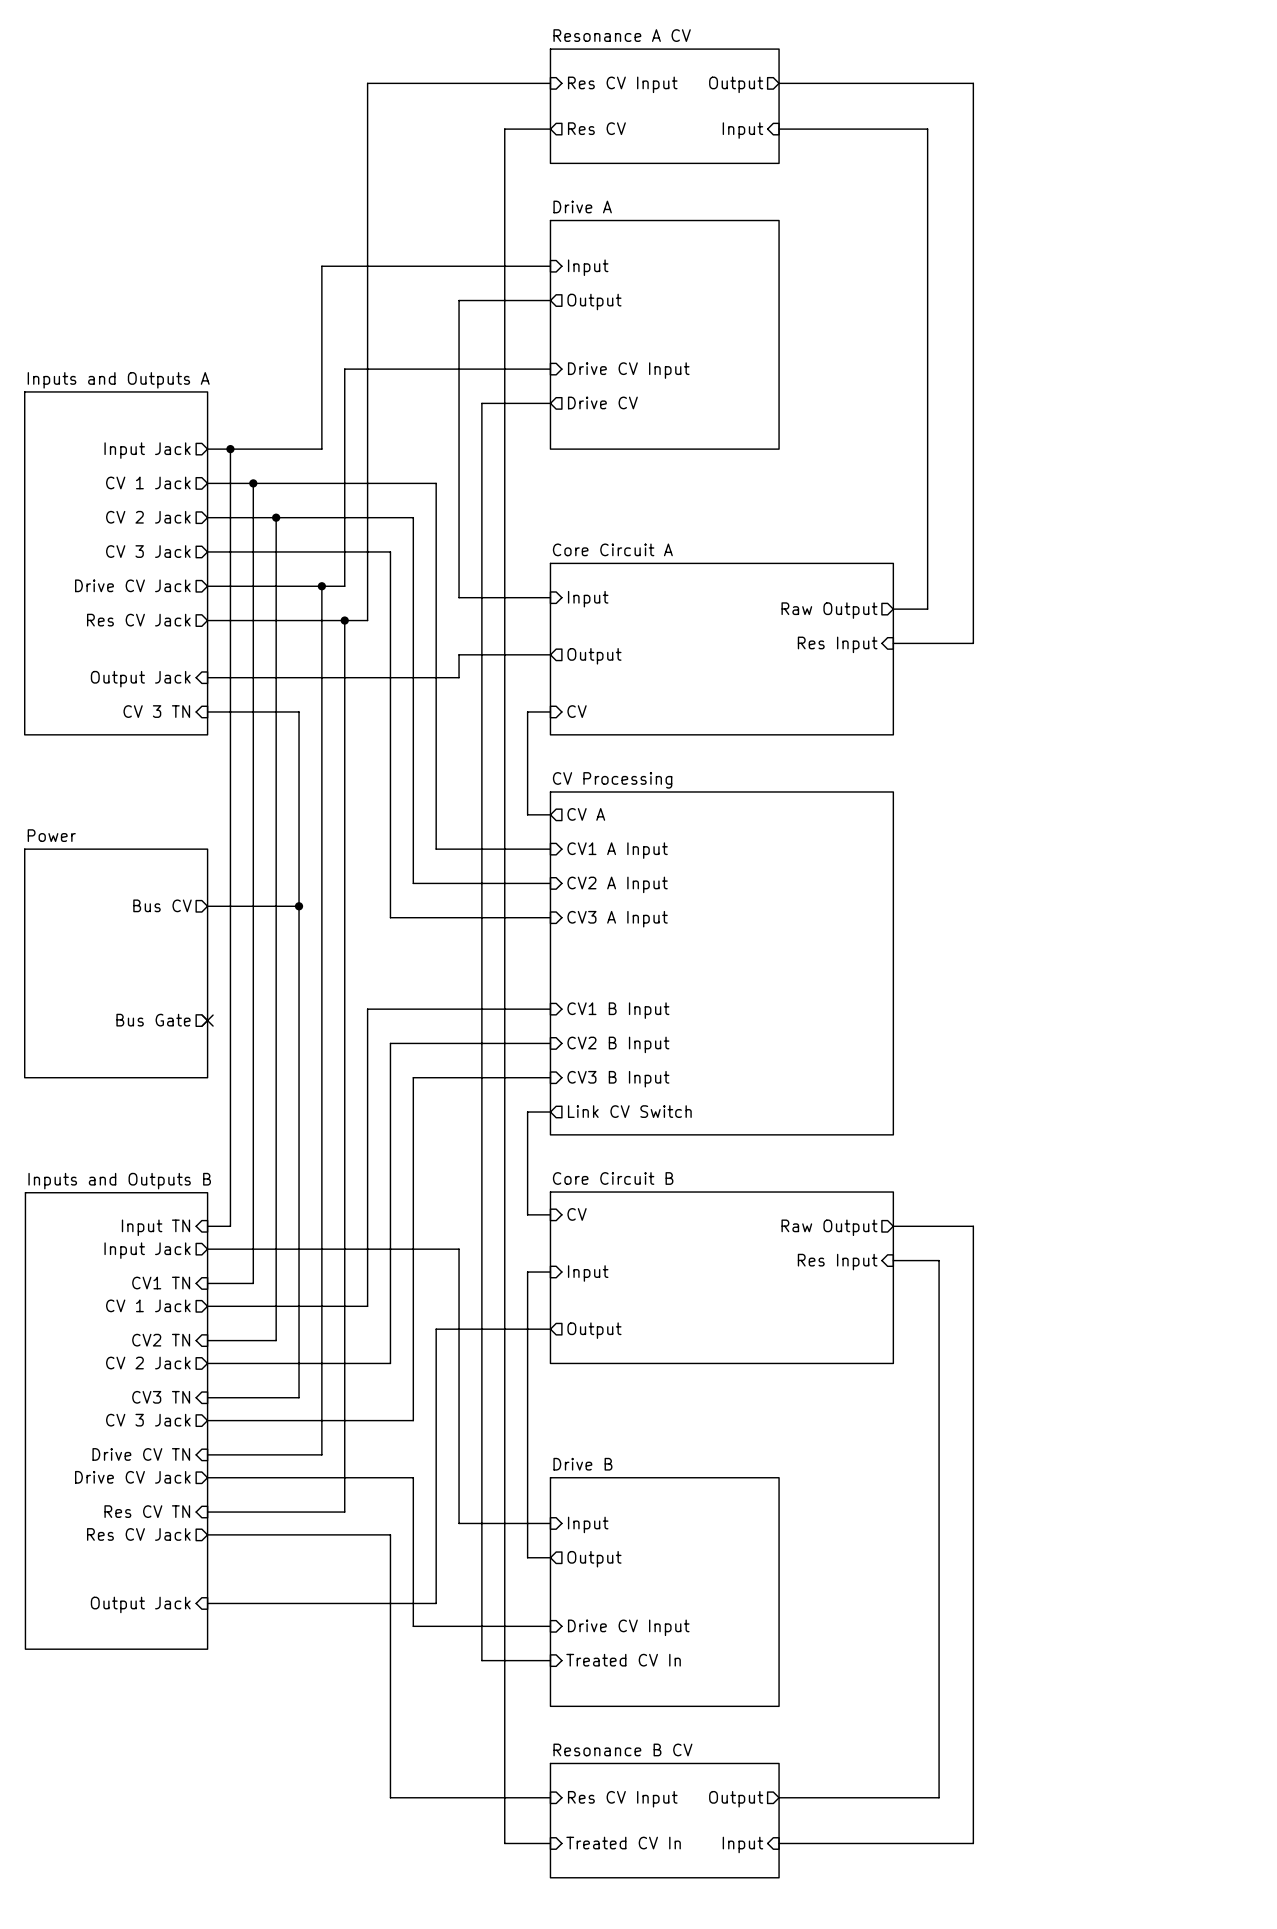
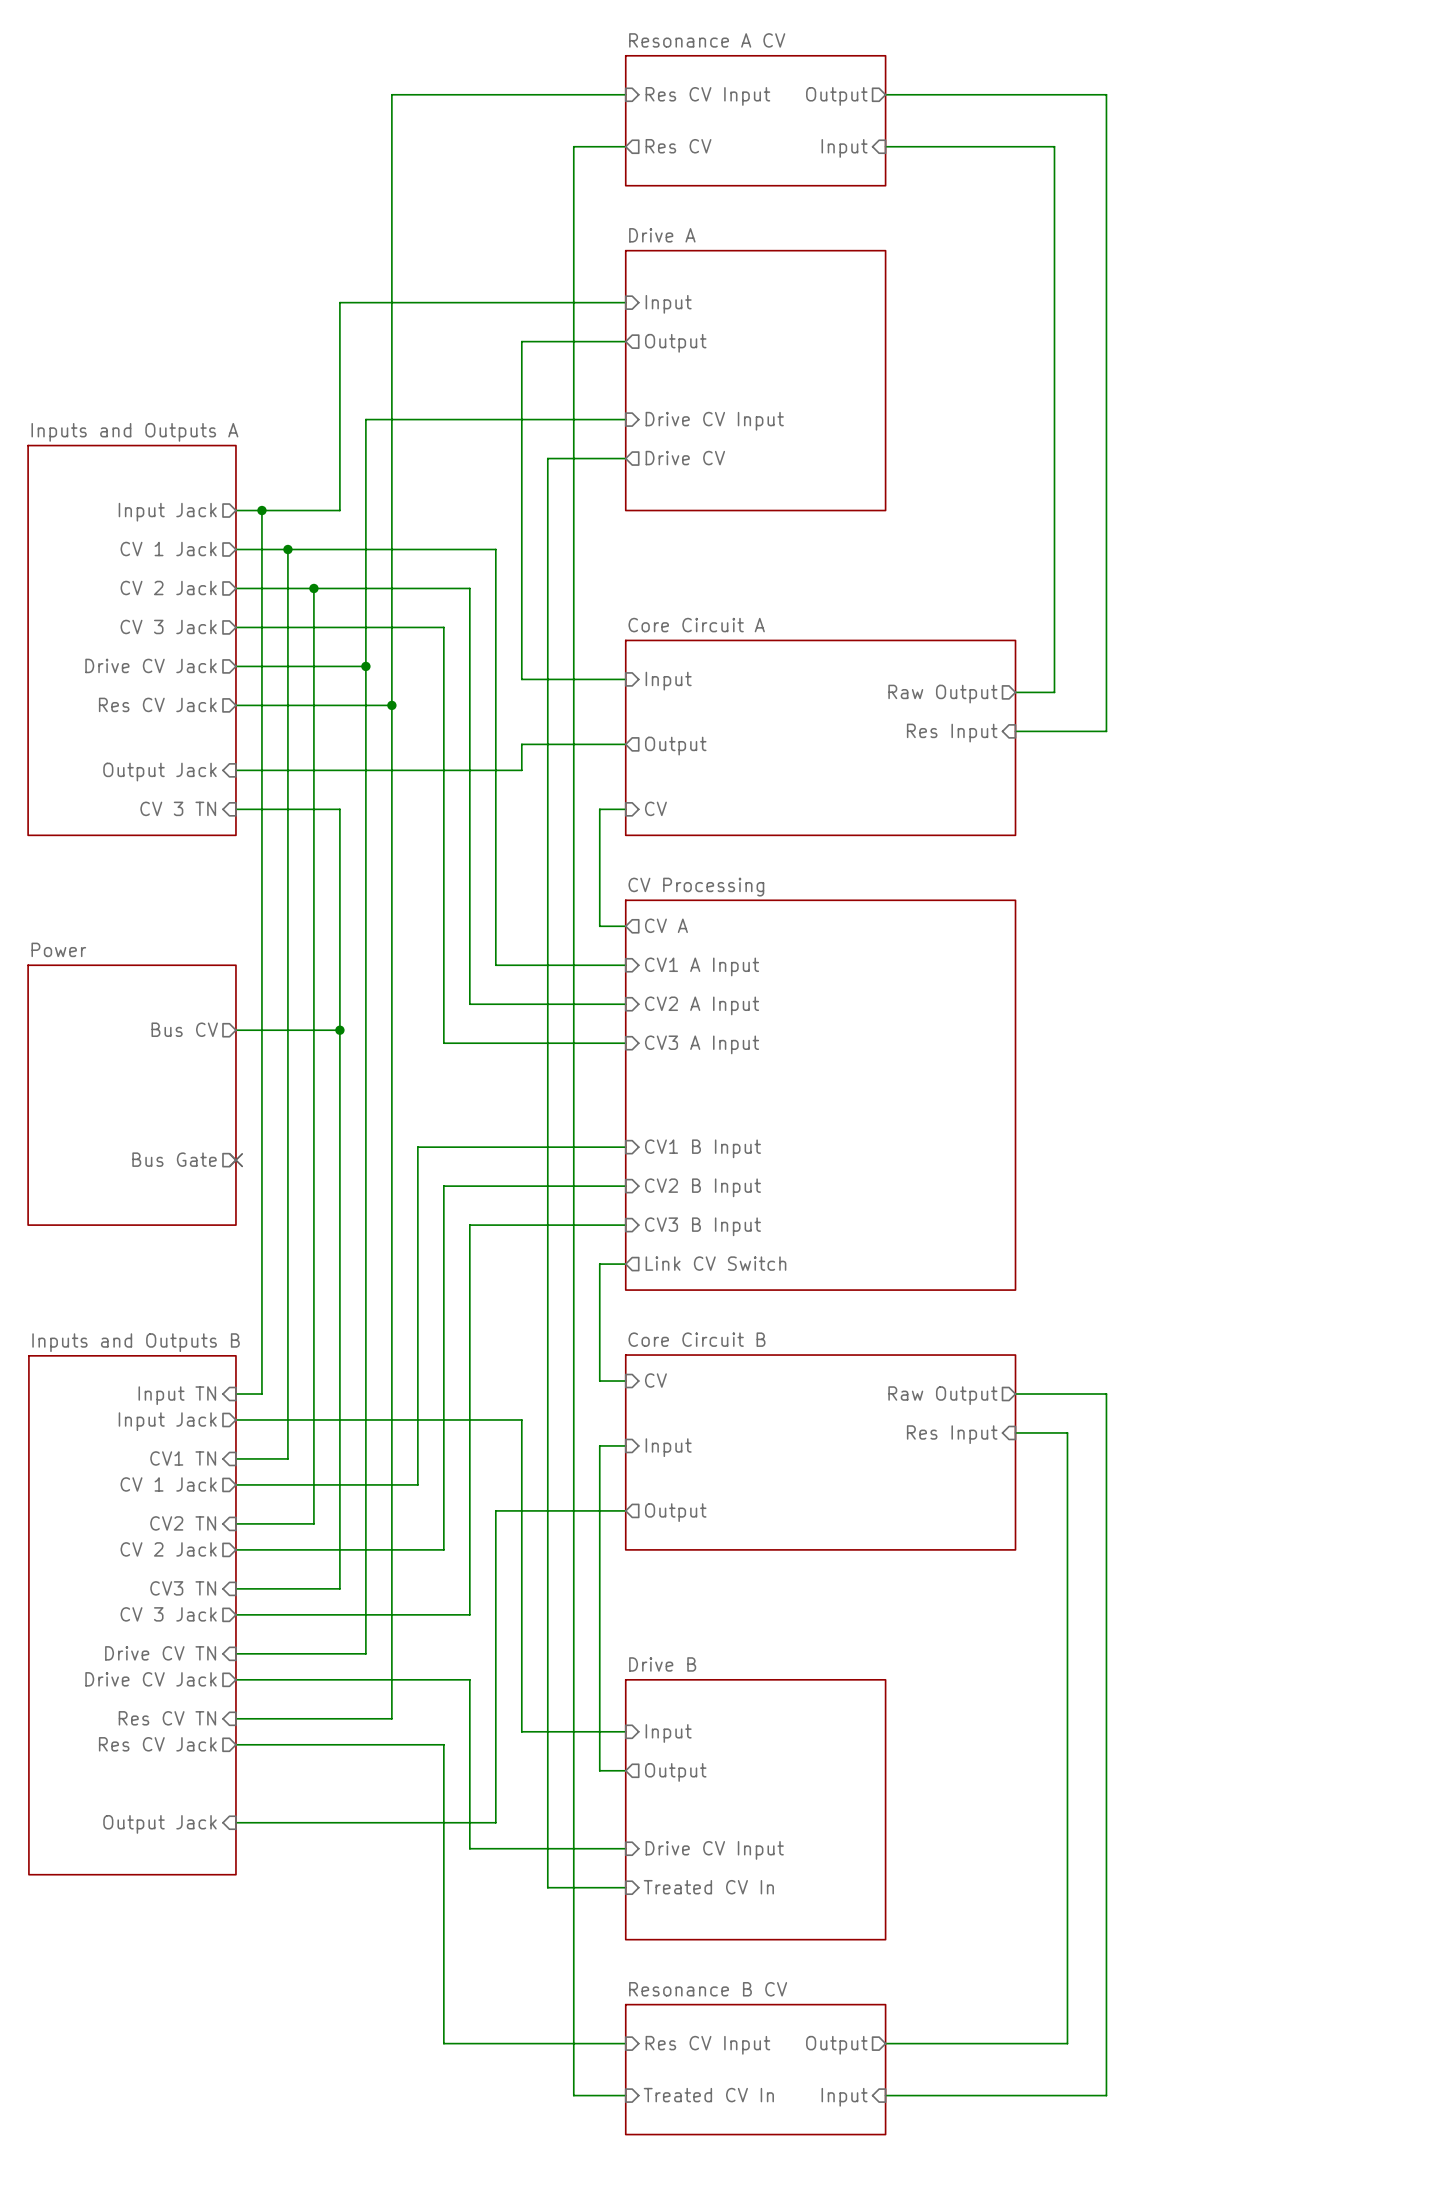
wire: (367, 83) (367, 620) (344, 620) -> (417, 94) (391, 94) (391, 419) (365, 419)
wire: (321, 266) (321, 369) -> (365, 302) (339, 302) (339, 510)
wire: (299, 449) (321, 449) -> (365, 666) (365, 510)
wire: (321, 586) (344, 586) -> (391, 705) (391, 666)

